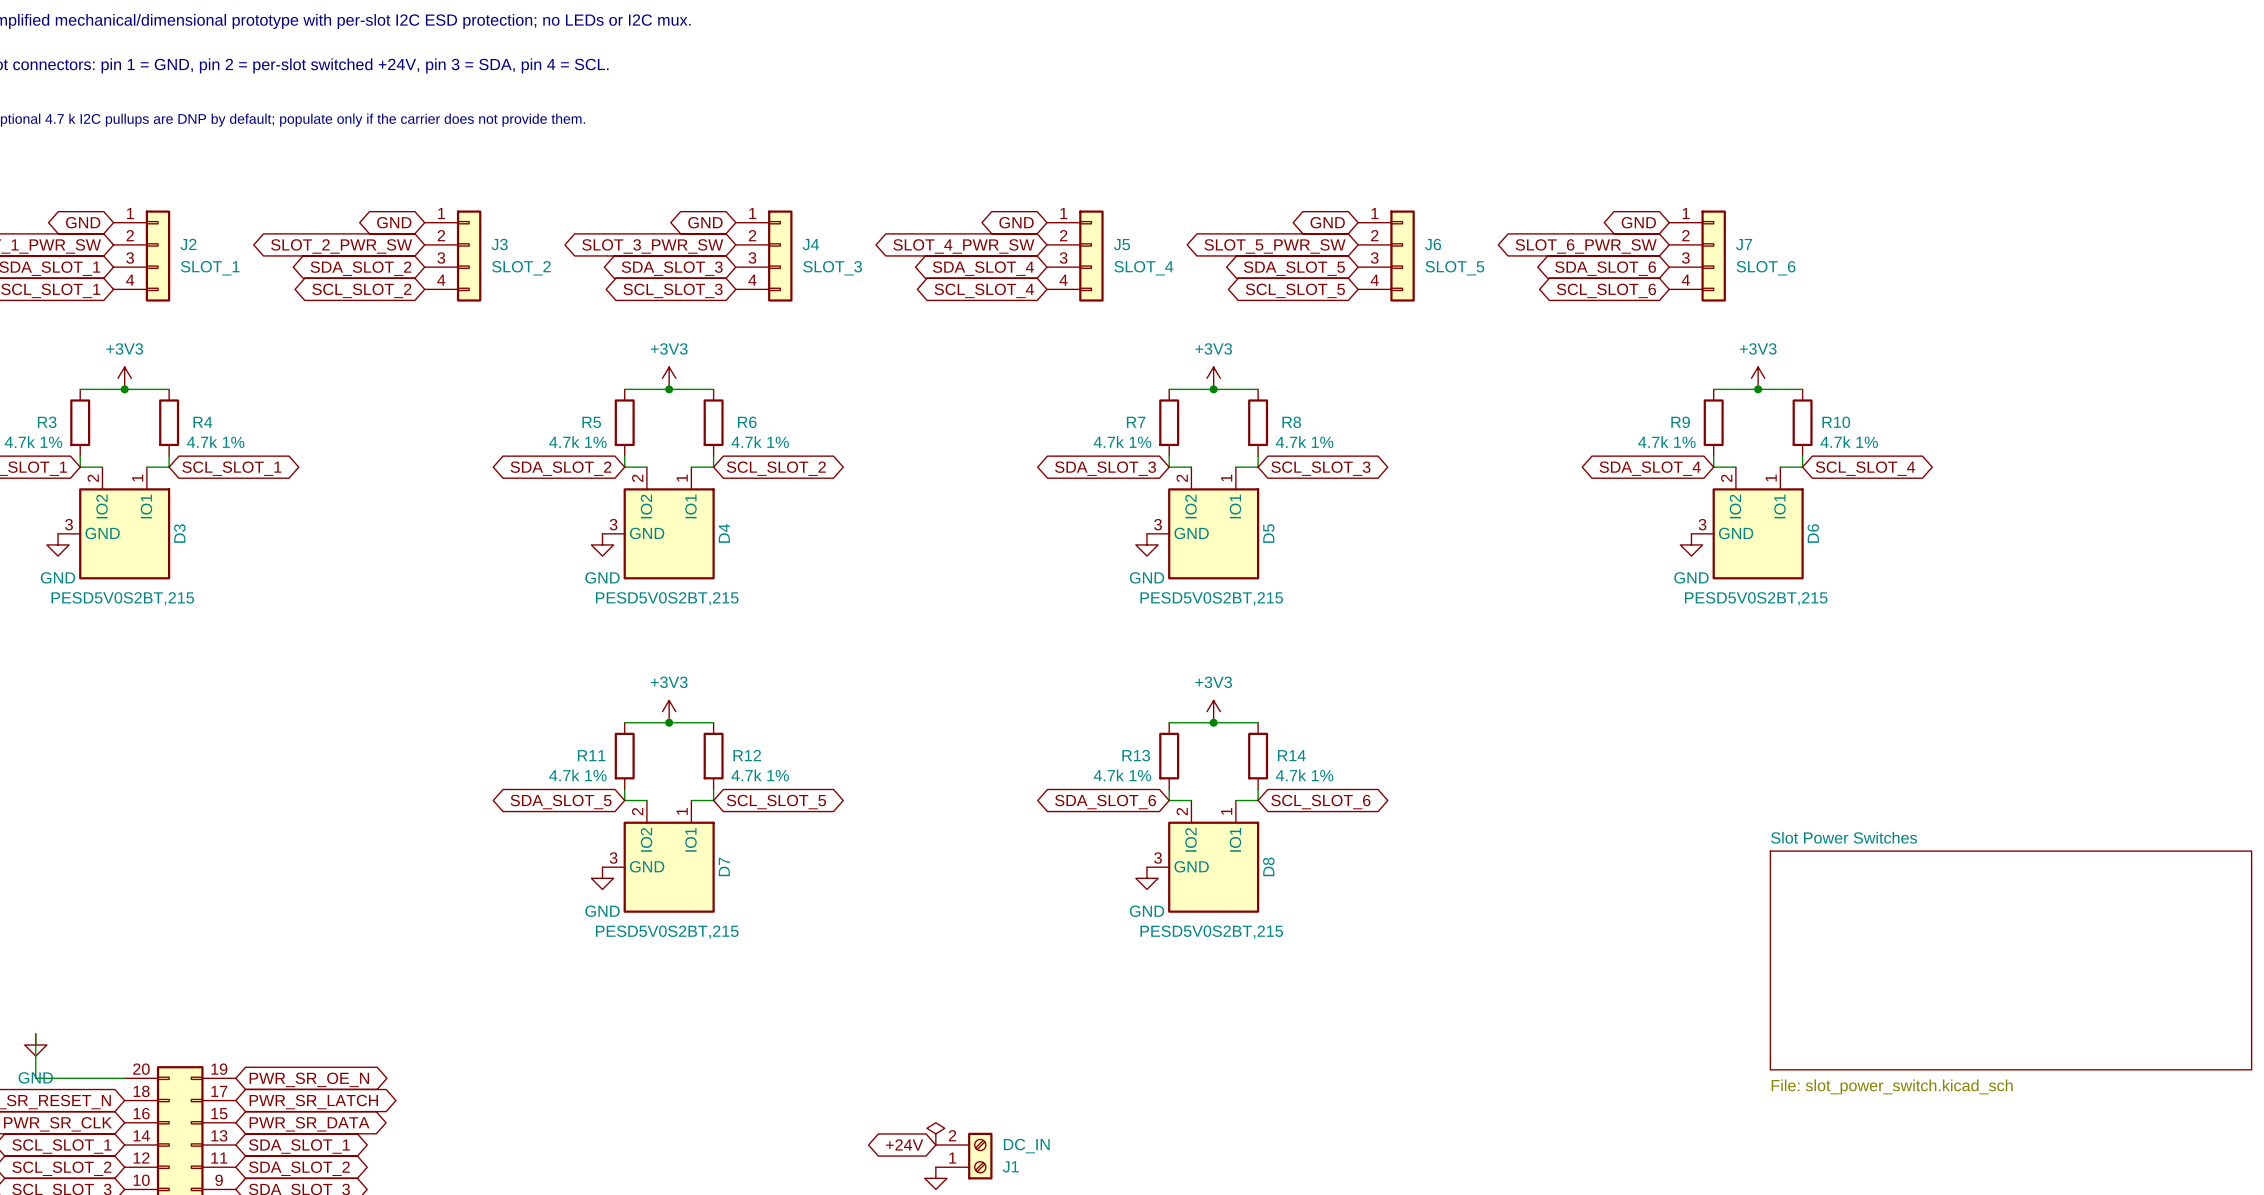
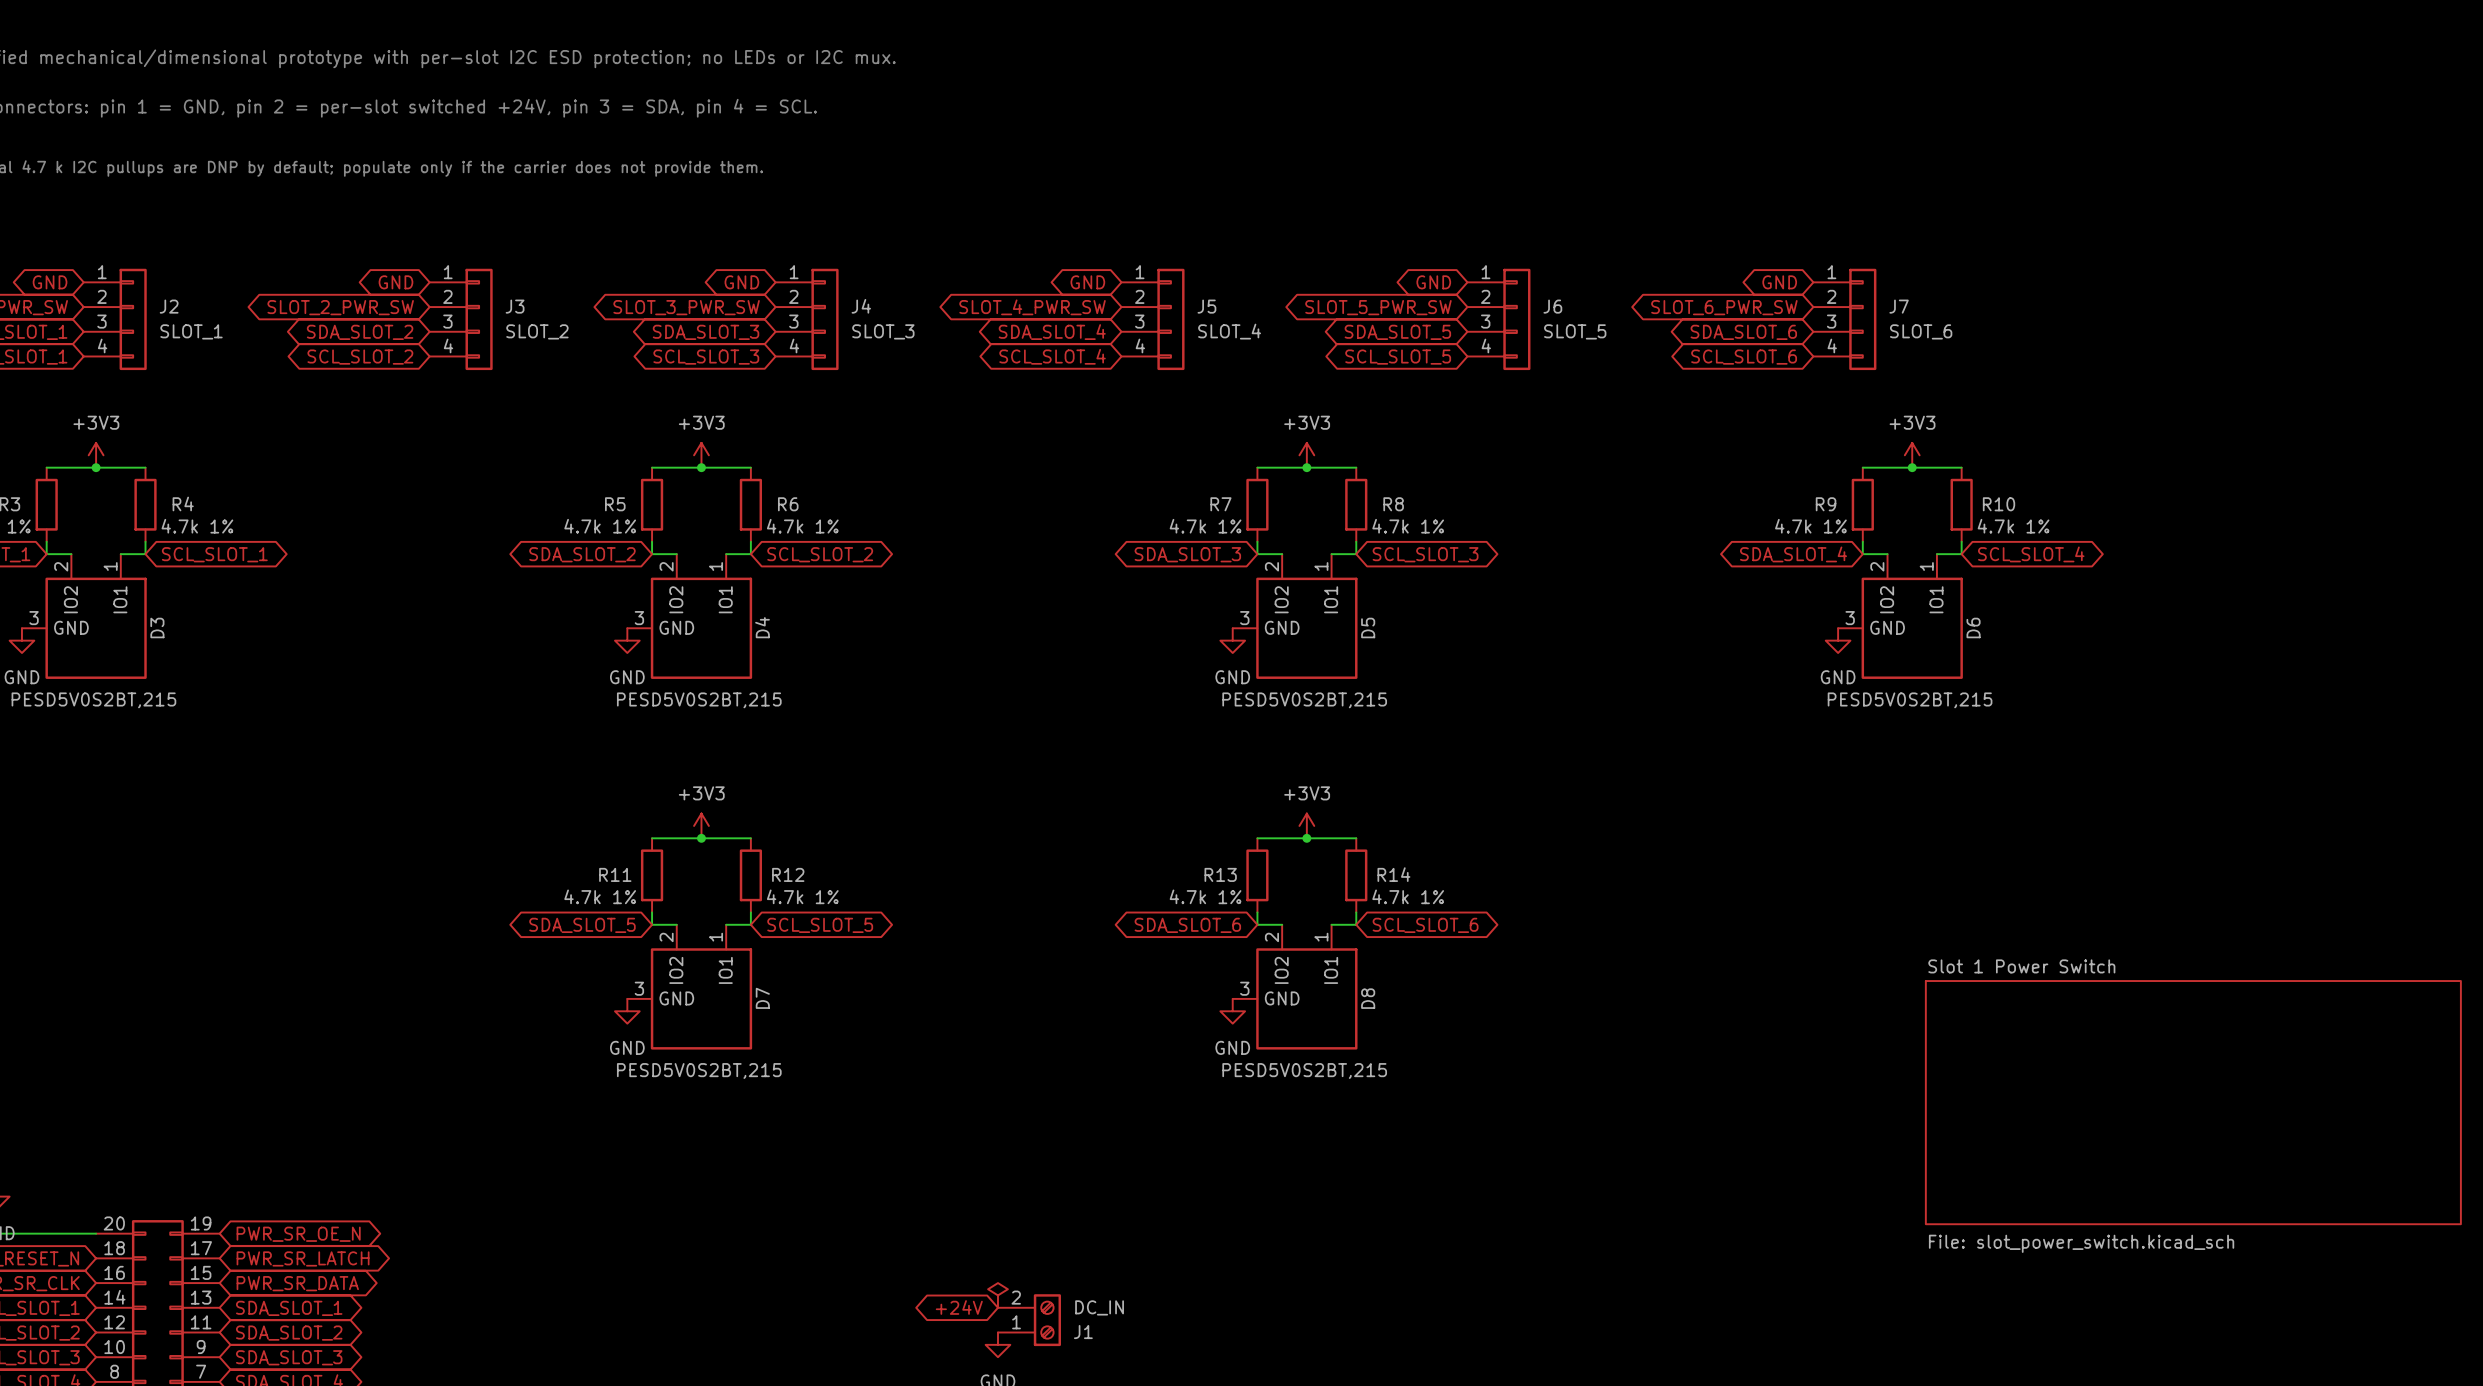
sheet Slot Power Switches name: Slot Power Switches (1844, 837) -> Slot 1 Power Switch (2021, 966)

